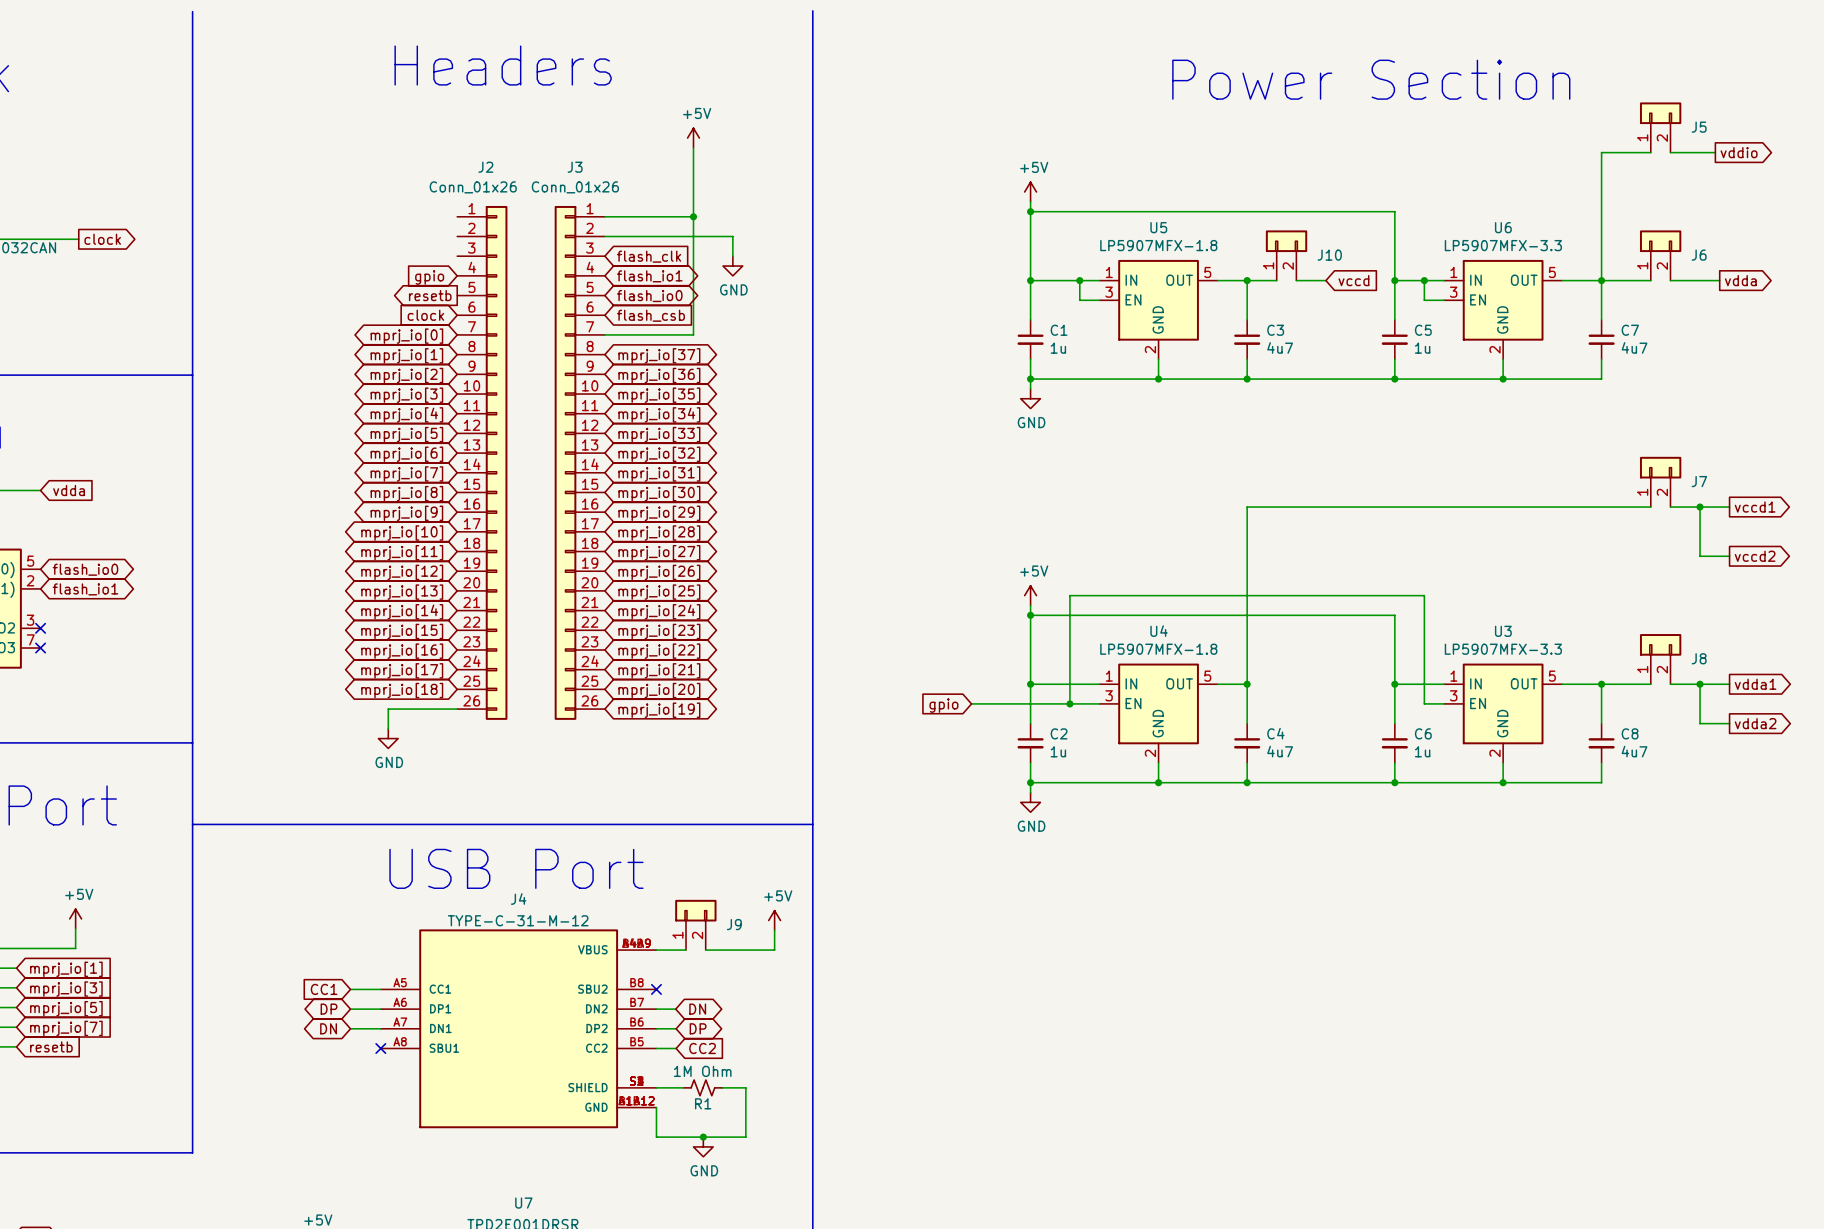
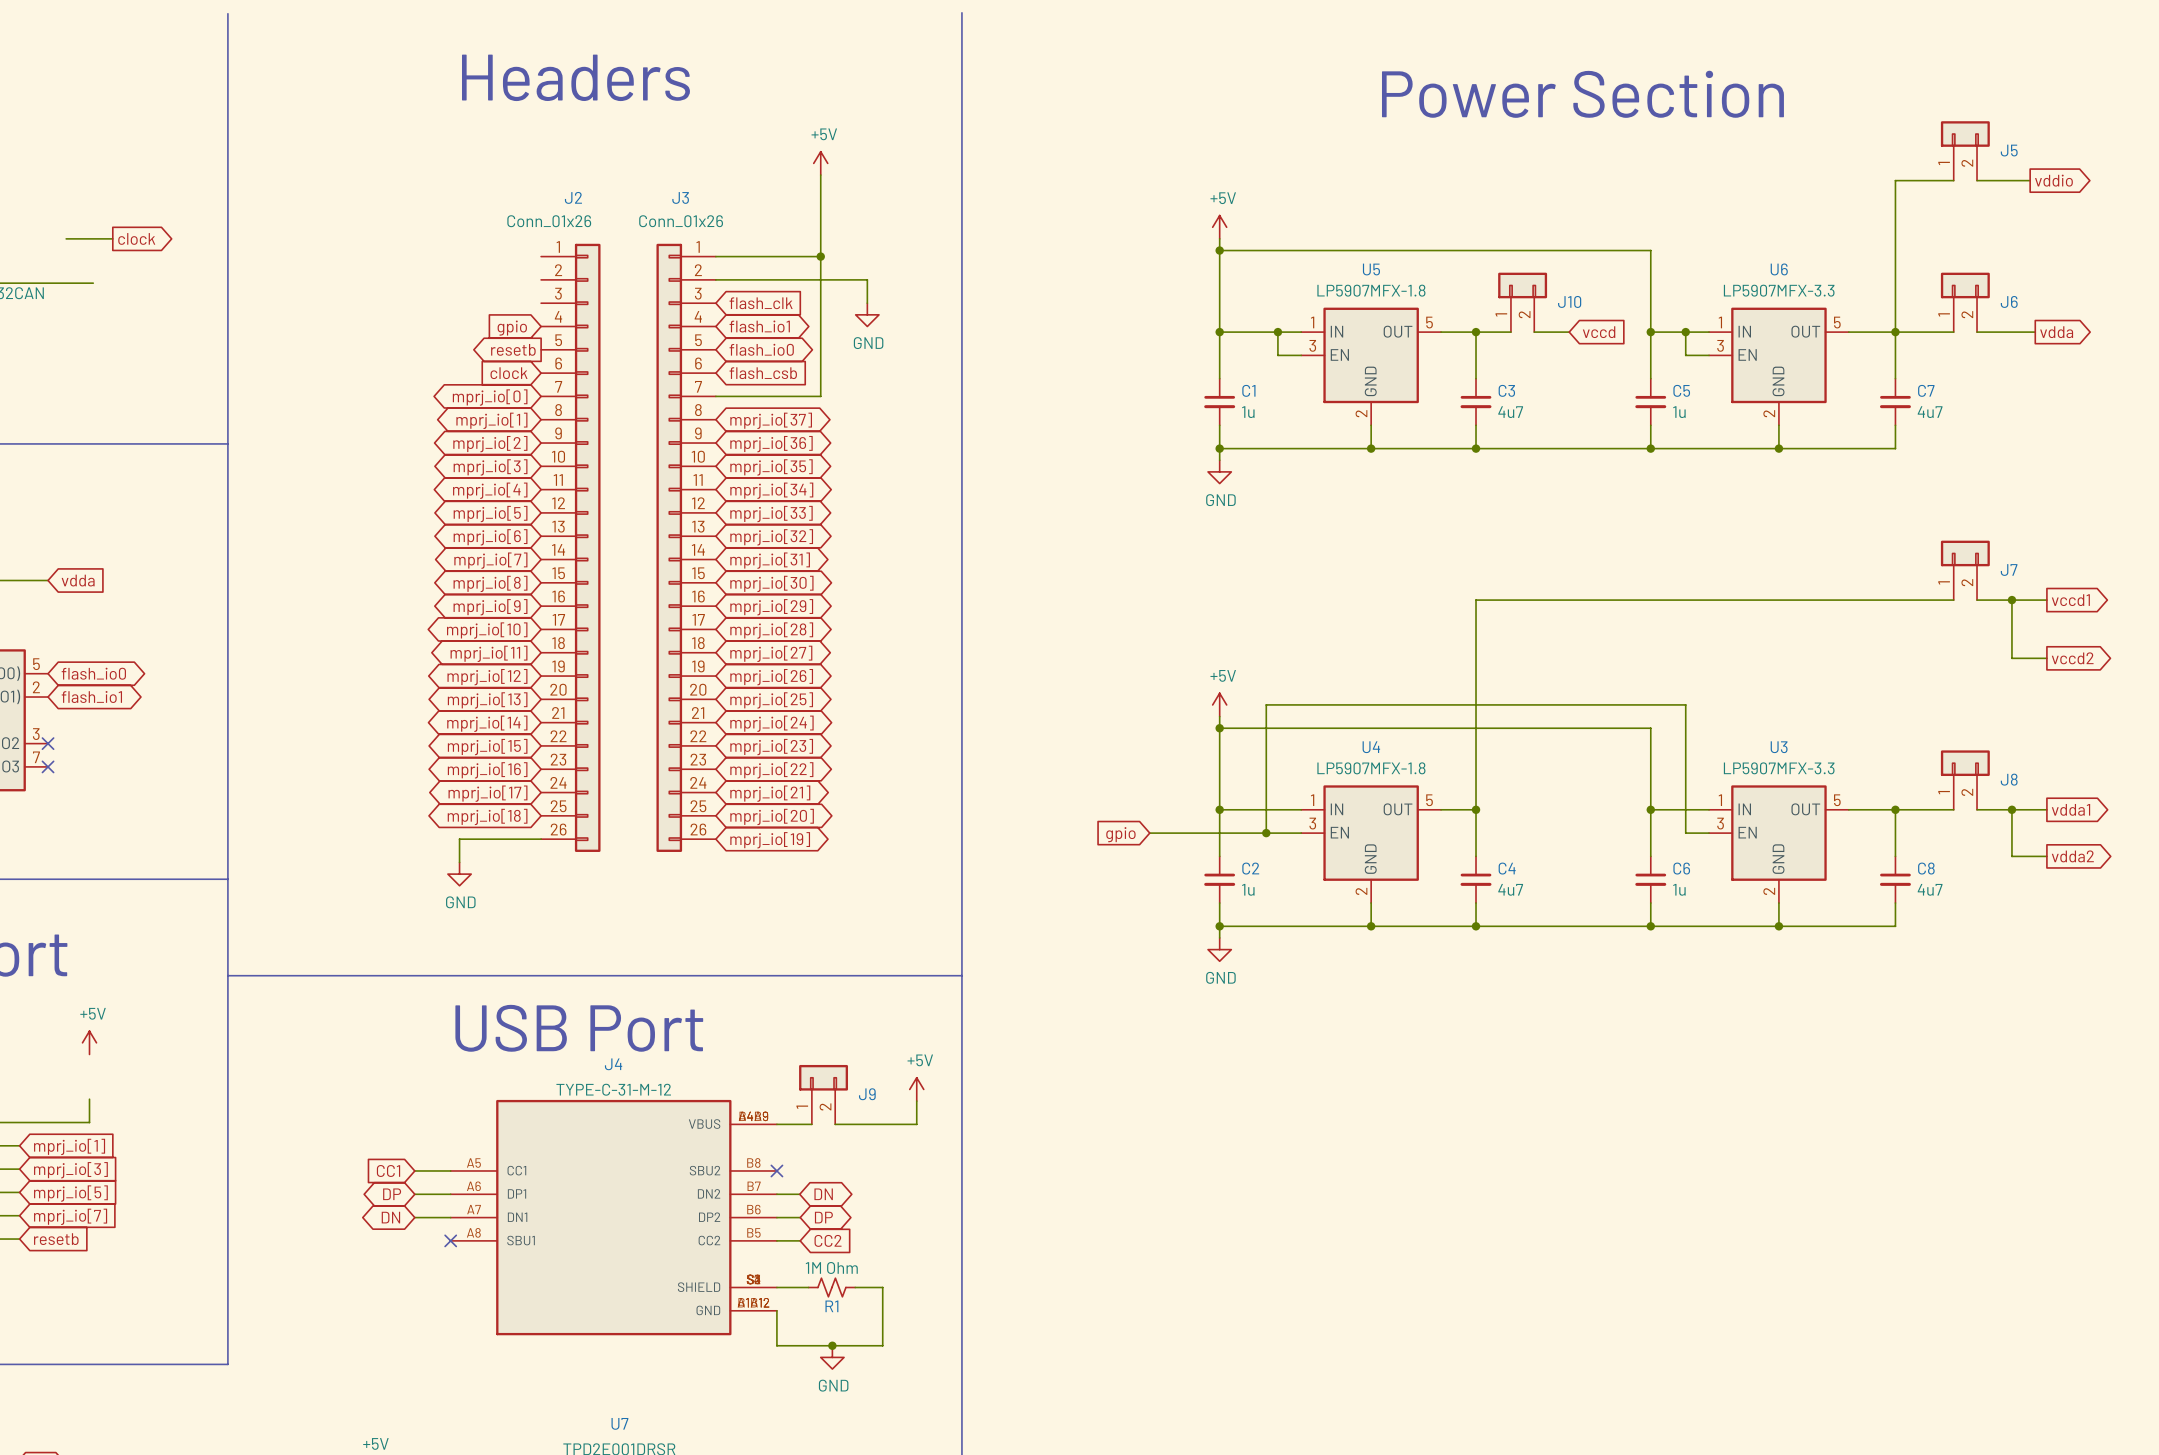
wire: none -> (66, 238) (112, 238)
global label position: clock (102, 239) -> clock (136, 238)
power symbol position: +5V (75, 918) -> +5V (89, 1042)

